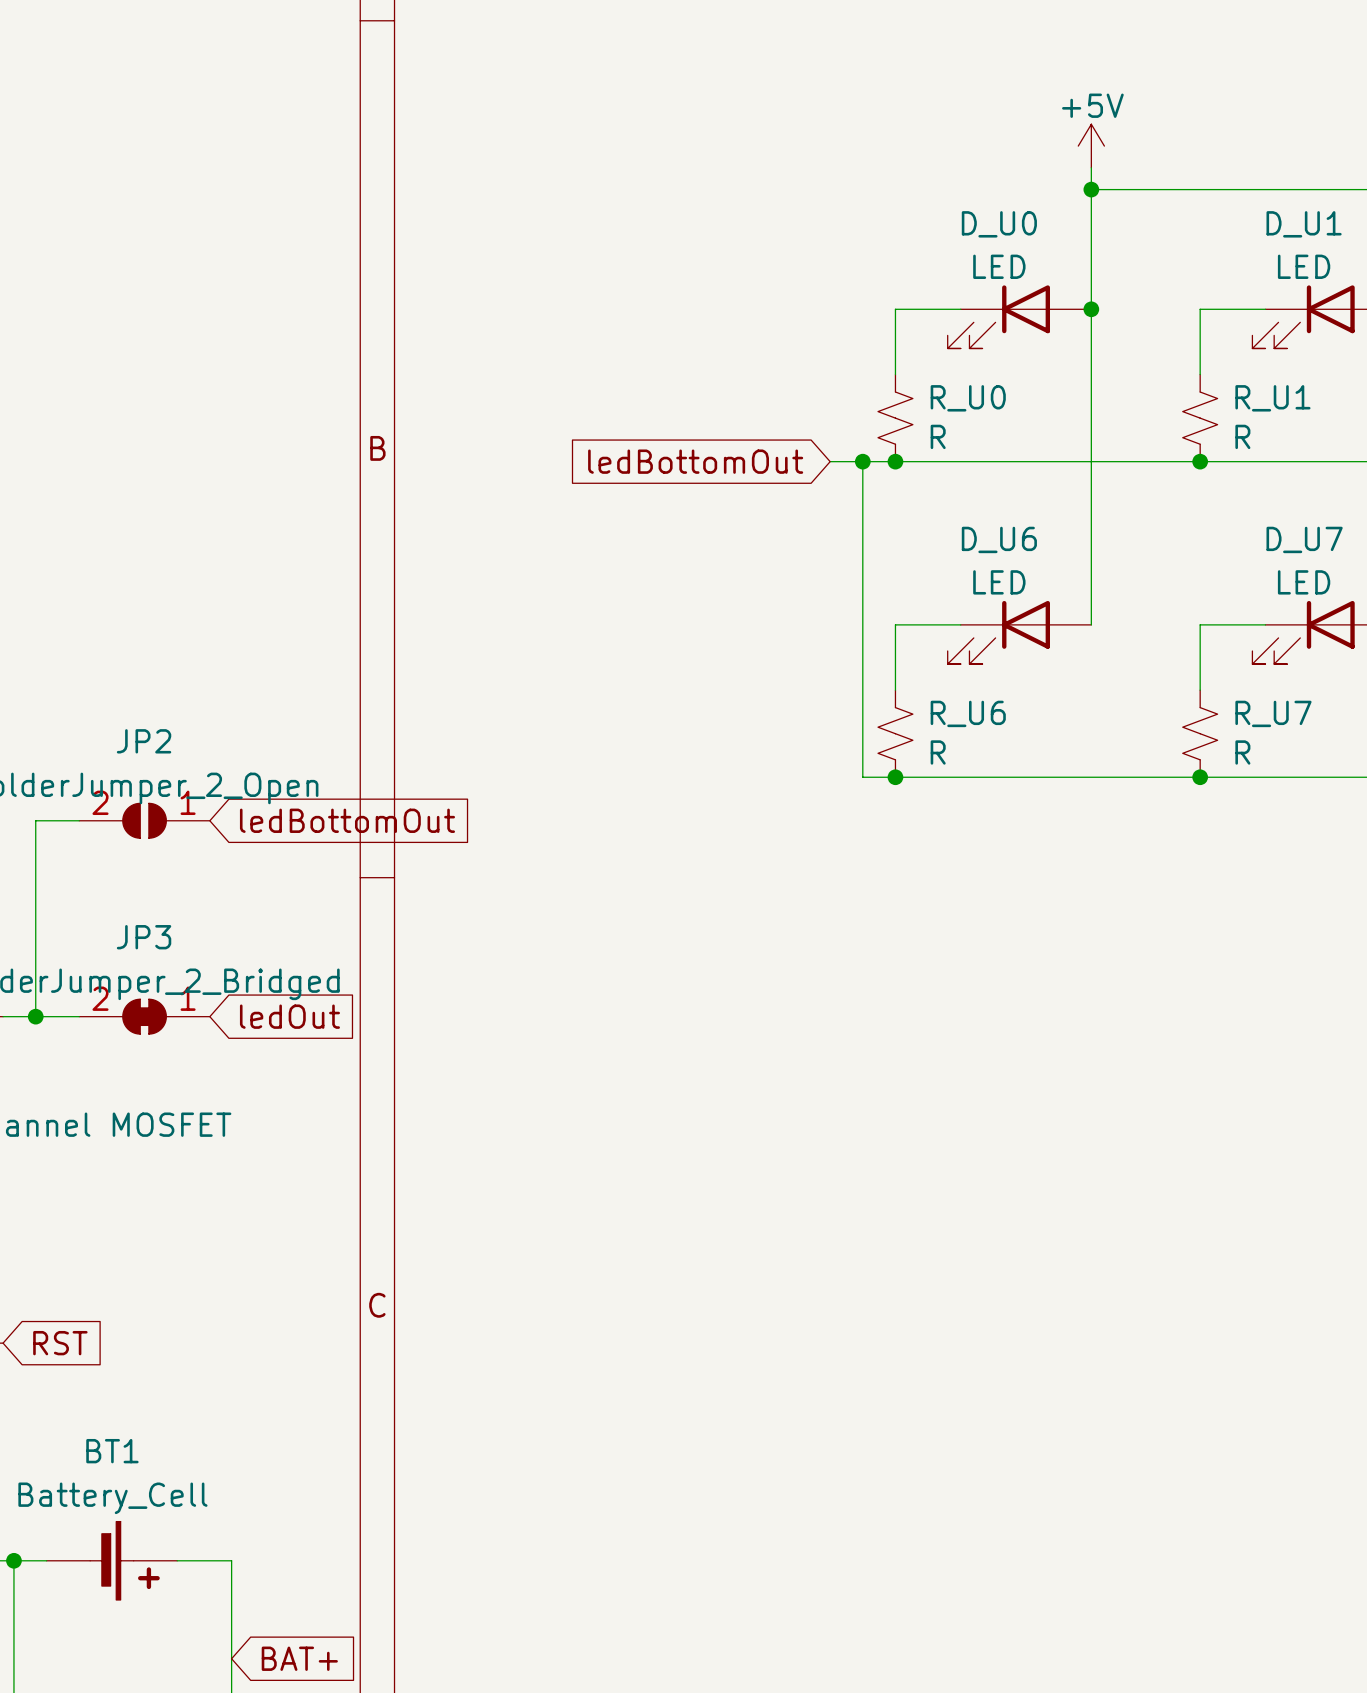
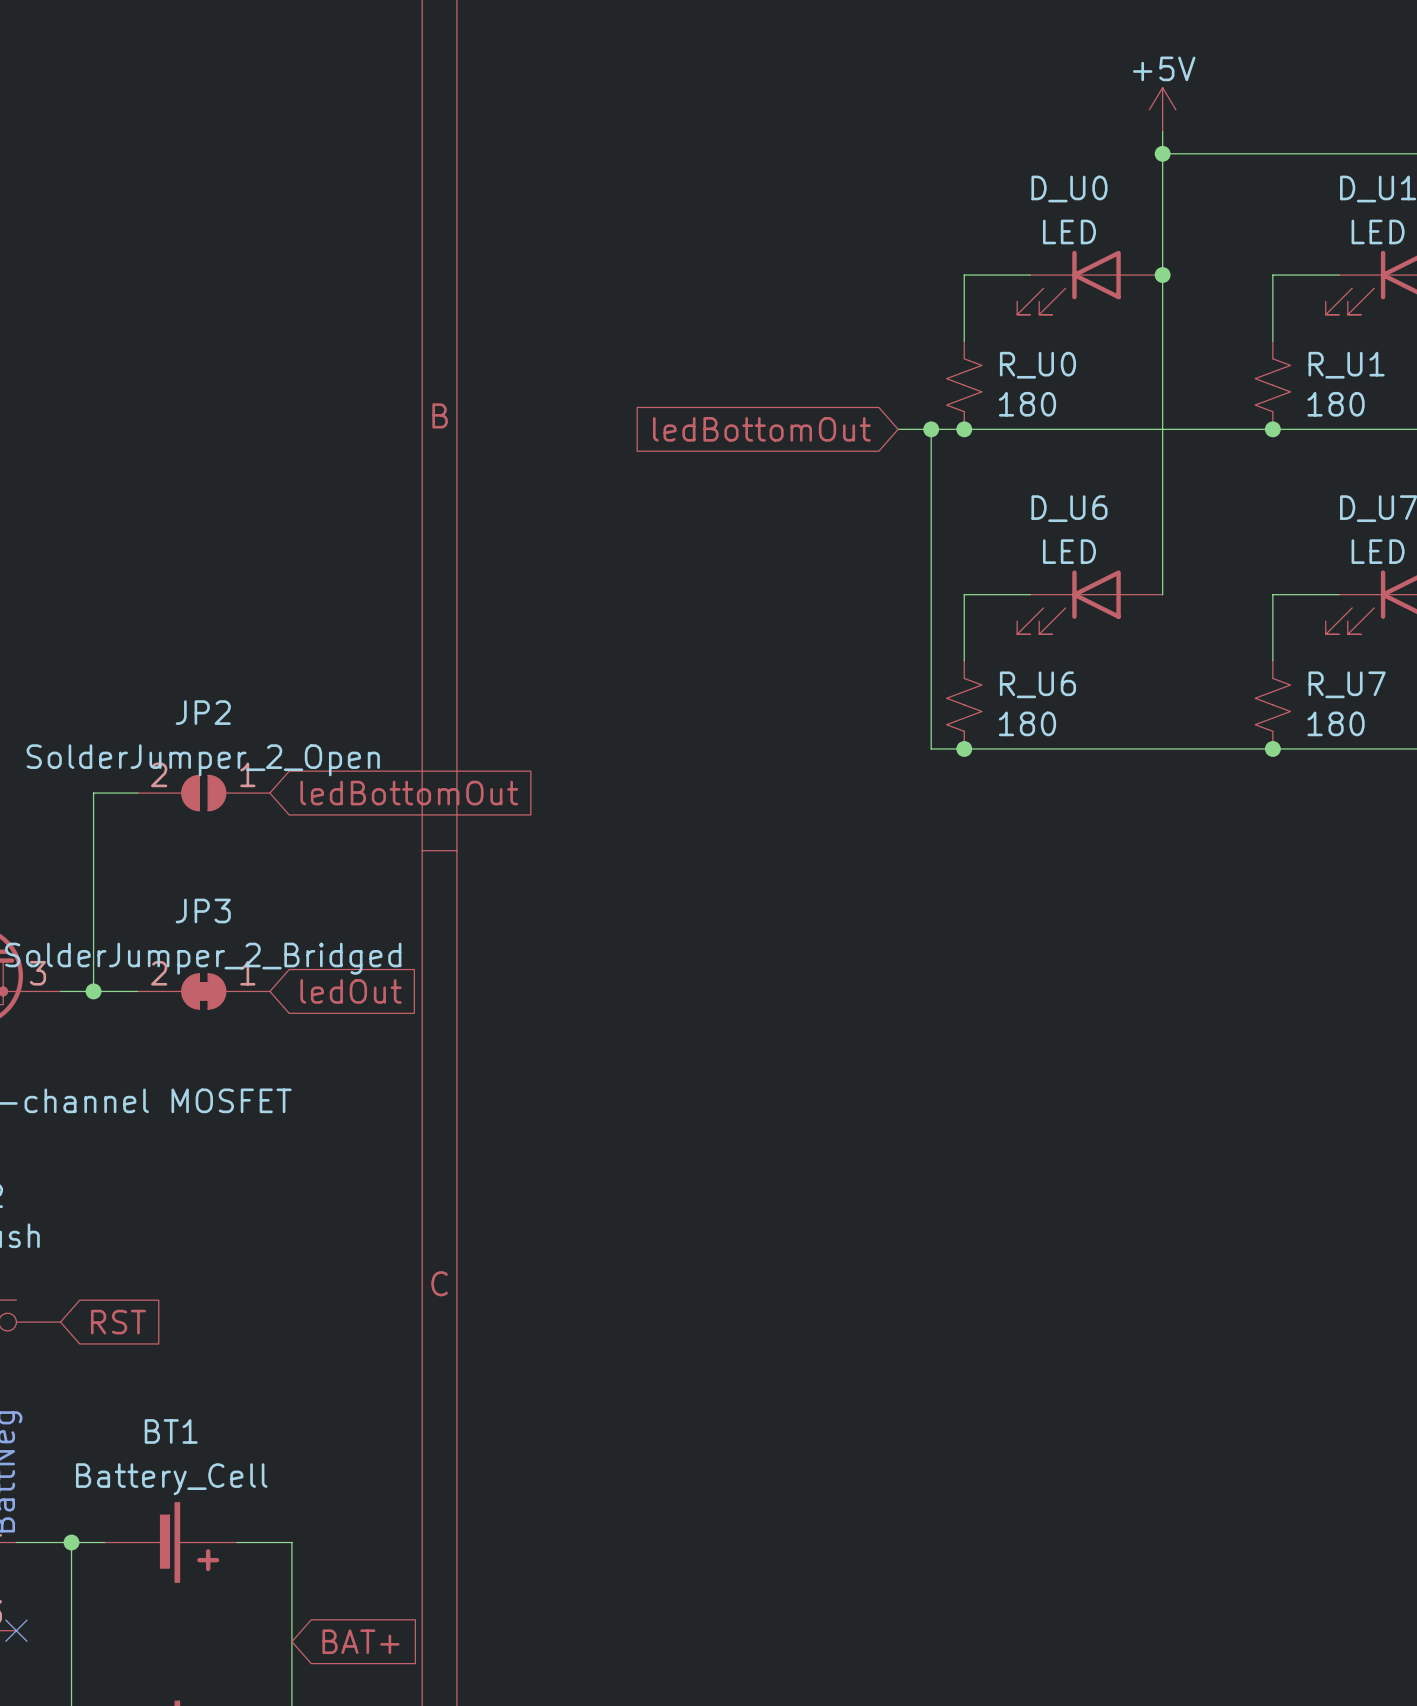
R_U0 value: R (938, 436) -> 180 (1027, 404)
R_U1 value: R (1242, 436) -> 180 (1336, 404)
R_U6 value: R (938, 752) -> 180 (1027, 723)
R_U7 value: R (1242, 752) -> 180 (1336, 723)

